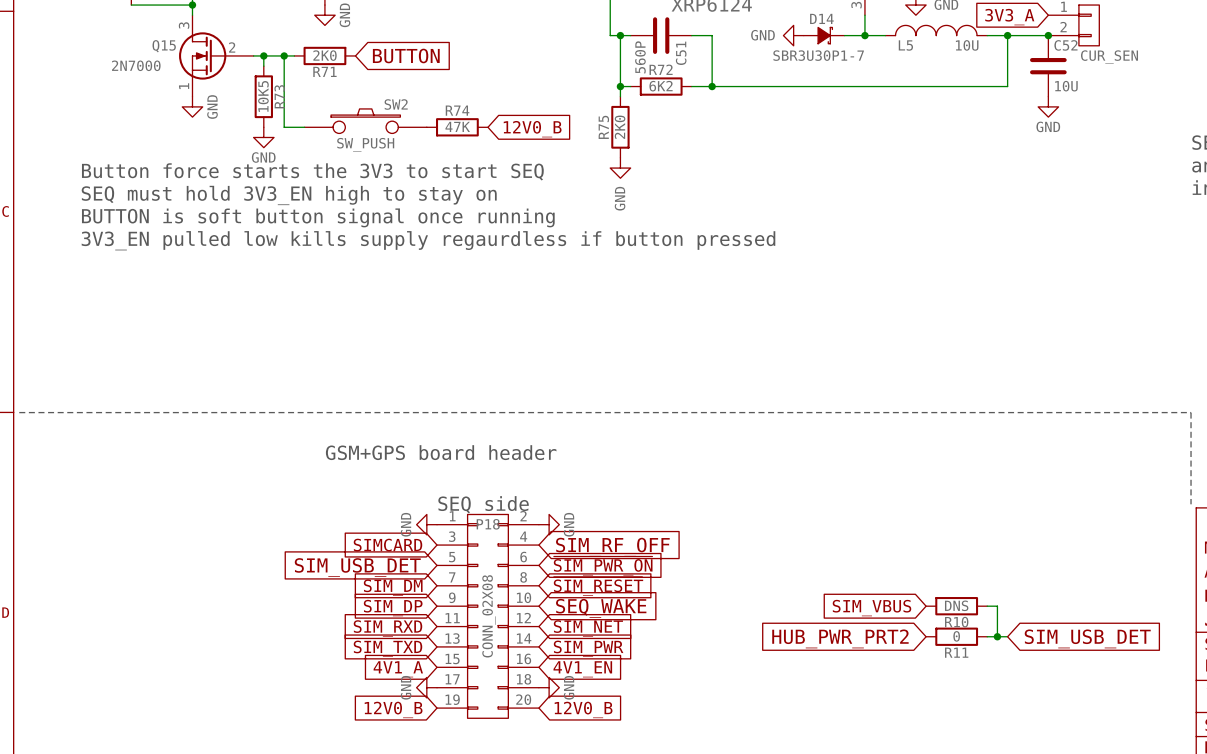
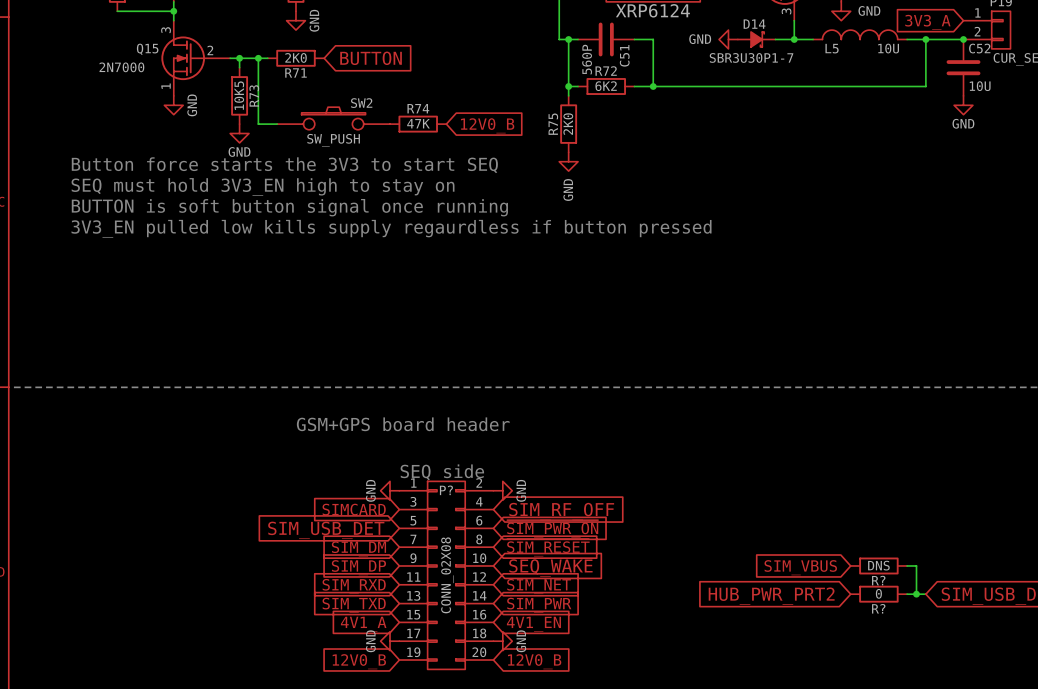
P18 name: P18 (488, 524) -> P? (446, 490)
R10 name: R10 (956, 622) -> R? (878, 580)
R11 name: R11 (956, 652) -> R? (878, 608)

